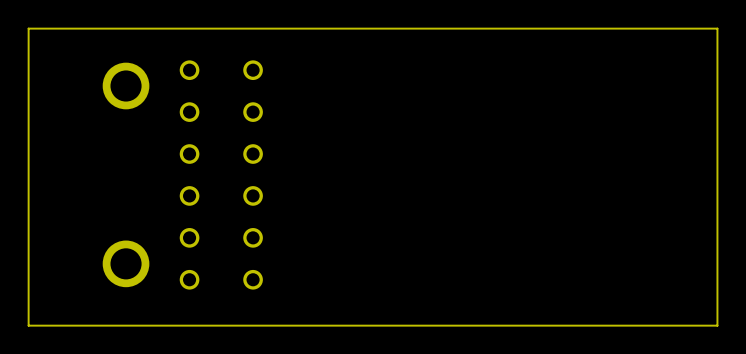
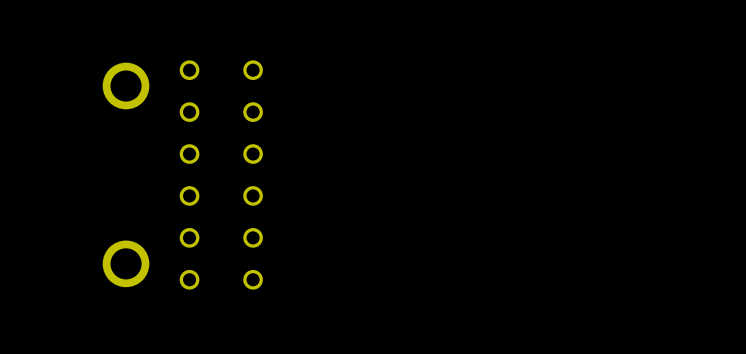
board edge: (717, 28) (28, 28) (28, 325) (717, 325) (717, 28) -> none

